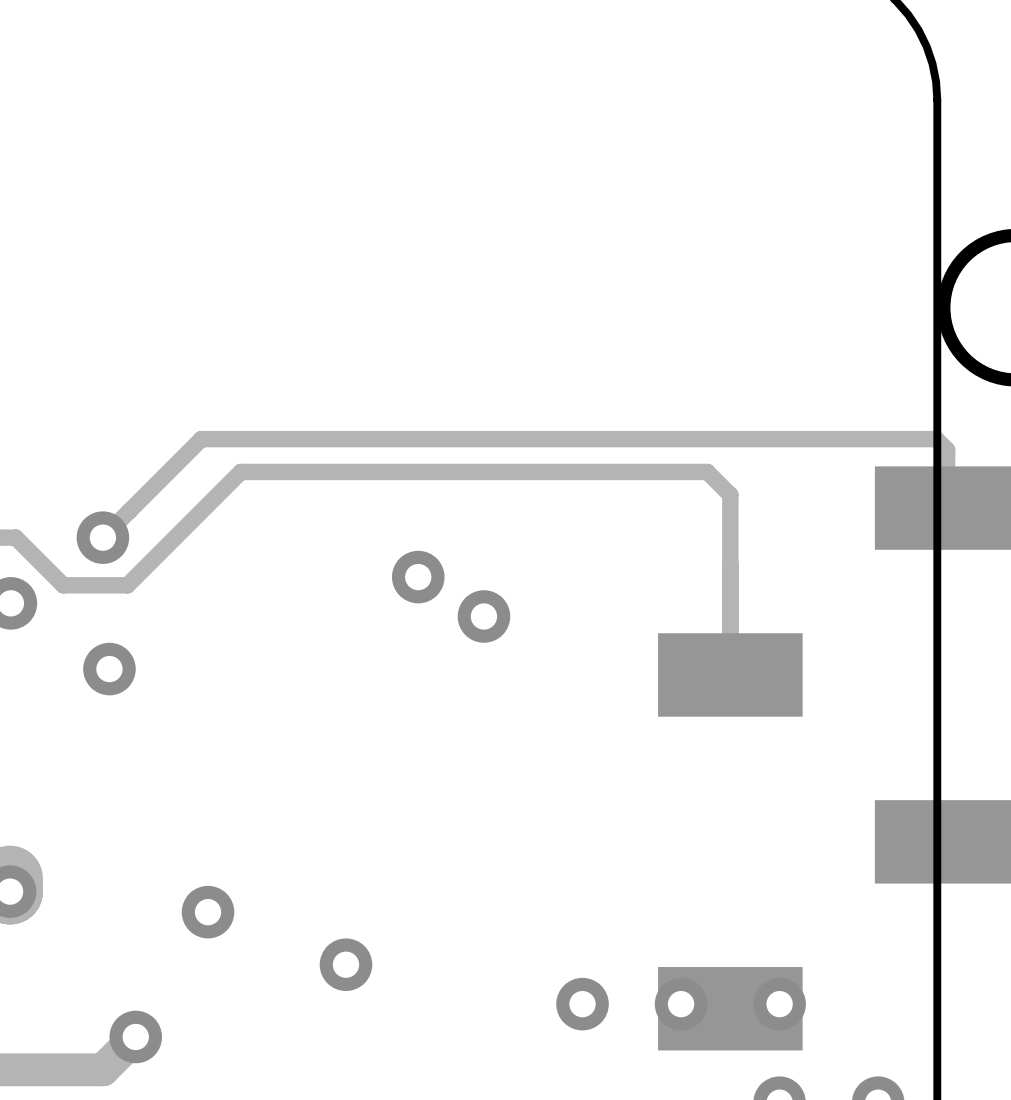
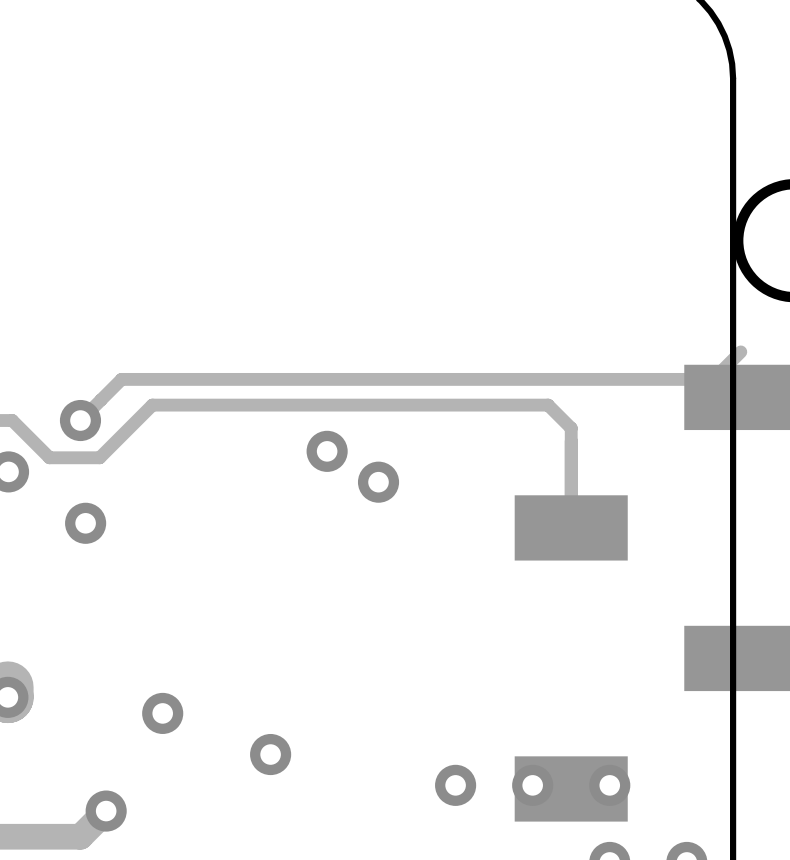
track: (155, 485) (201, 439) (936, 439) (947, 449) (947, 508) -> (121, 379) (713, 379) (740, 351)
track: (194, 517) (240, 471) (707, 471) (730, 494) (730, 547) -> (152, 405) (548, 405) (571, 428)

